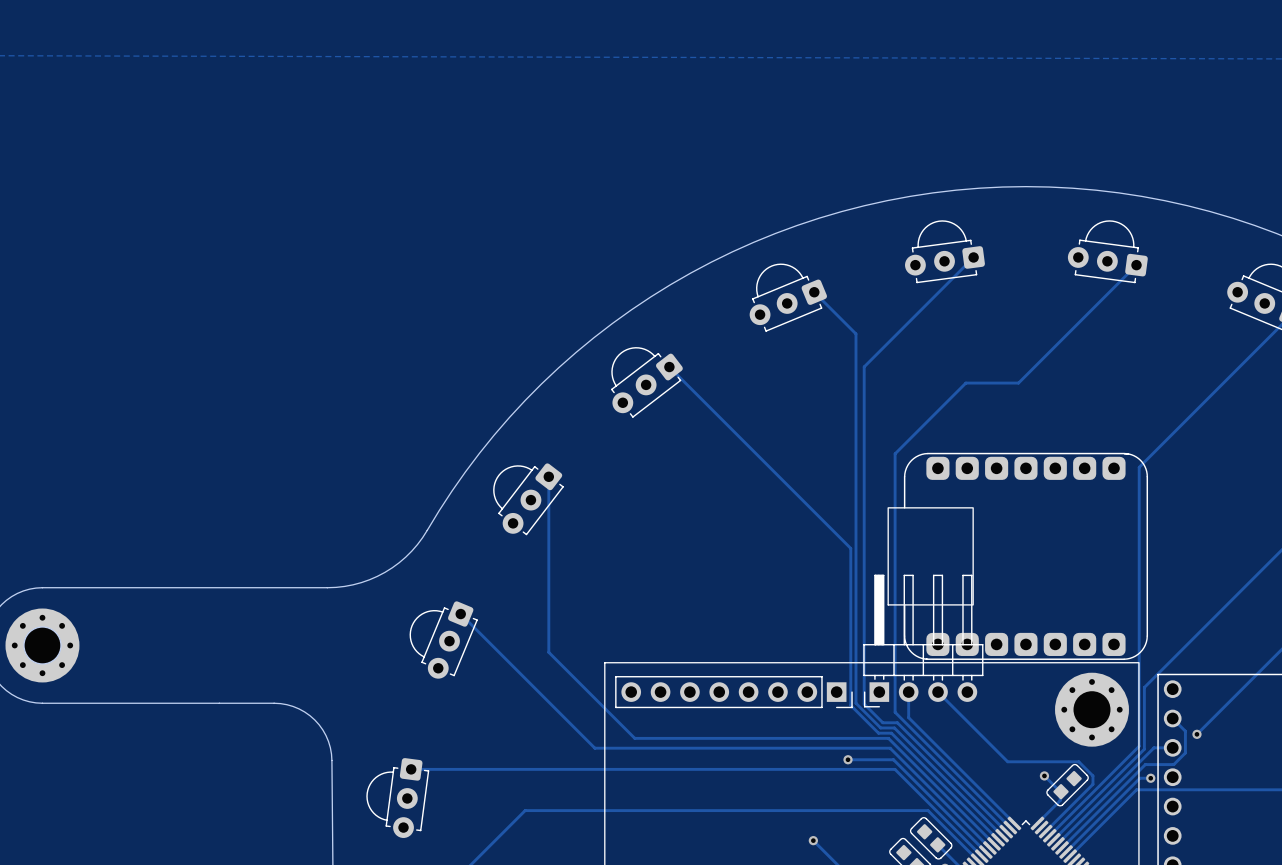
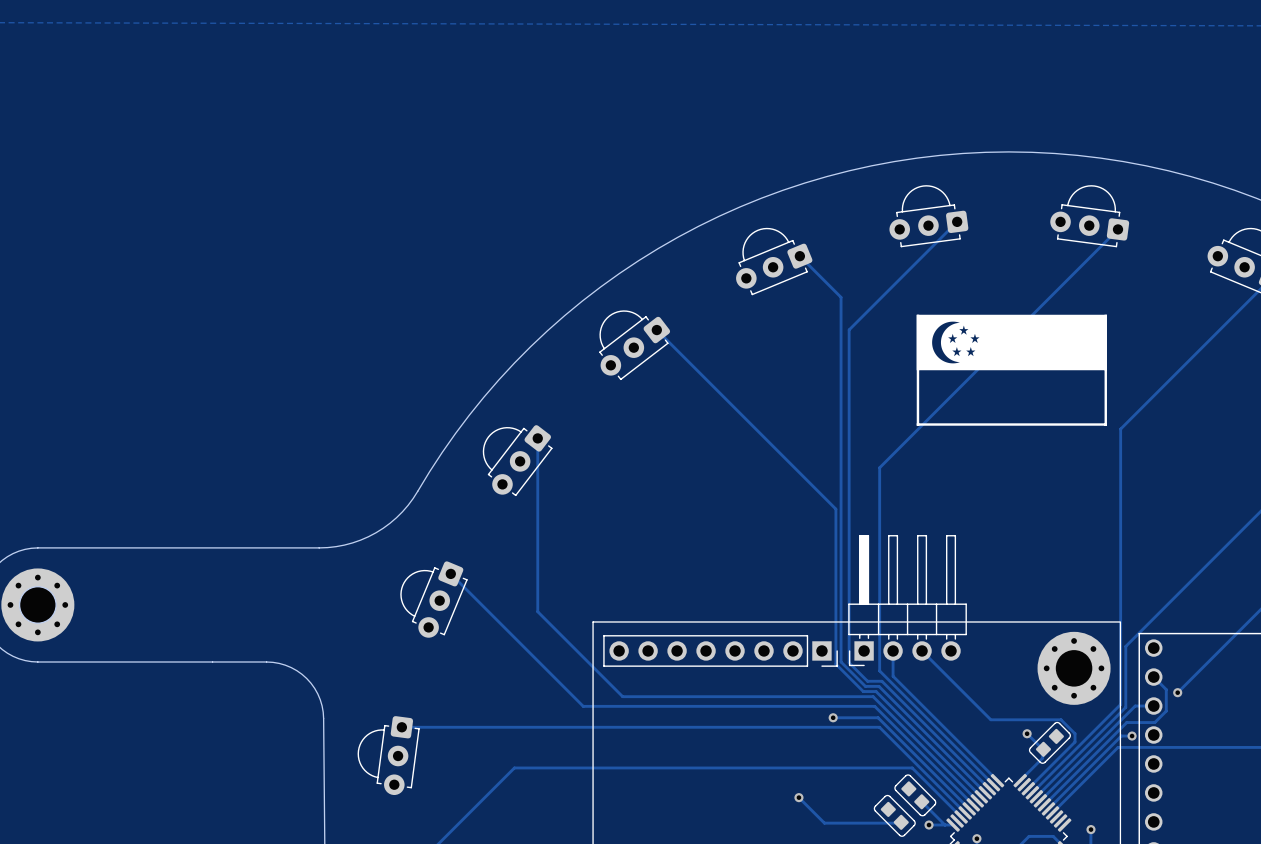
drawing: none -> [916, 314, 1107, 426]
track: (1018, 383) (965, 383) (895, 453) (895, 506) -> (1001, 345) (879, 467)
part: (1017, 556) -> none

